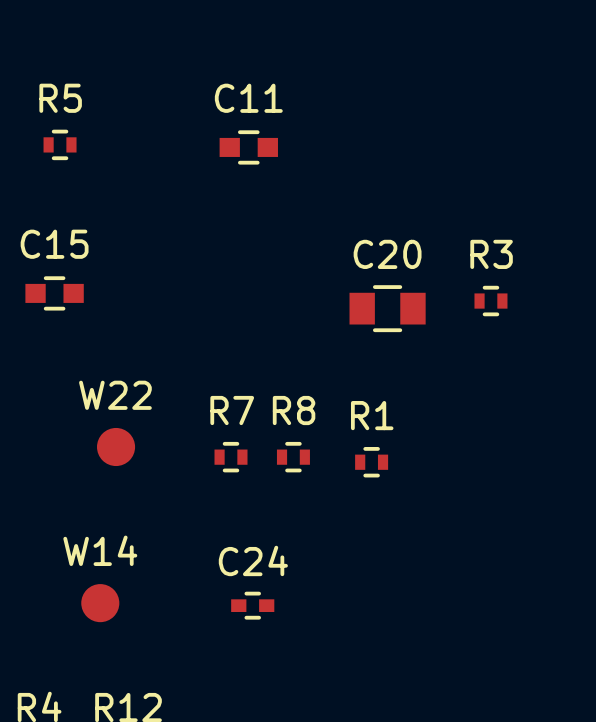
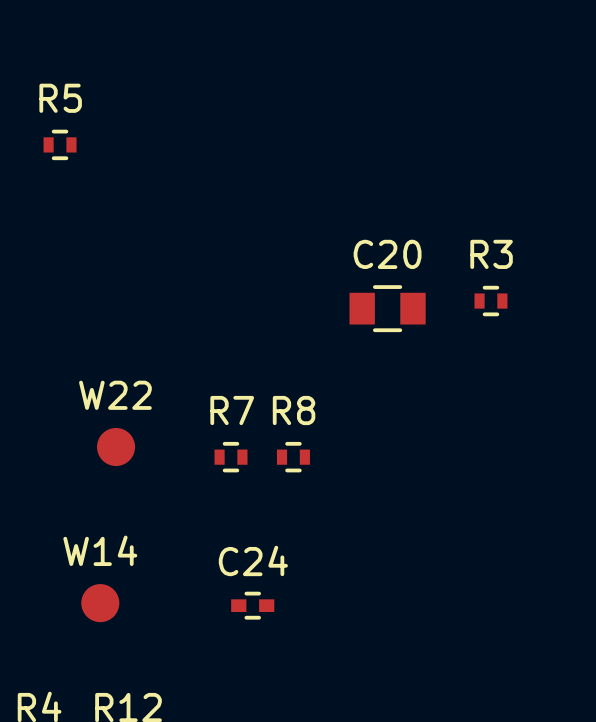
C11: (248, 147) -> none
C15: (54, 293) -> none
R1: (371, 462) -> none

